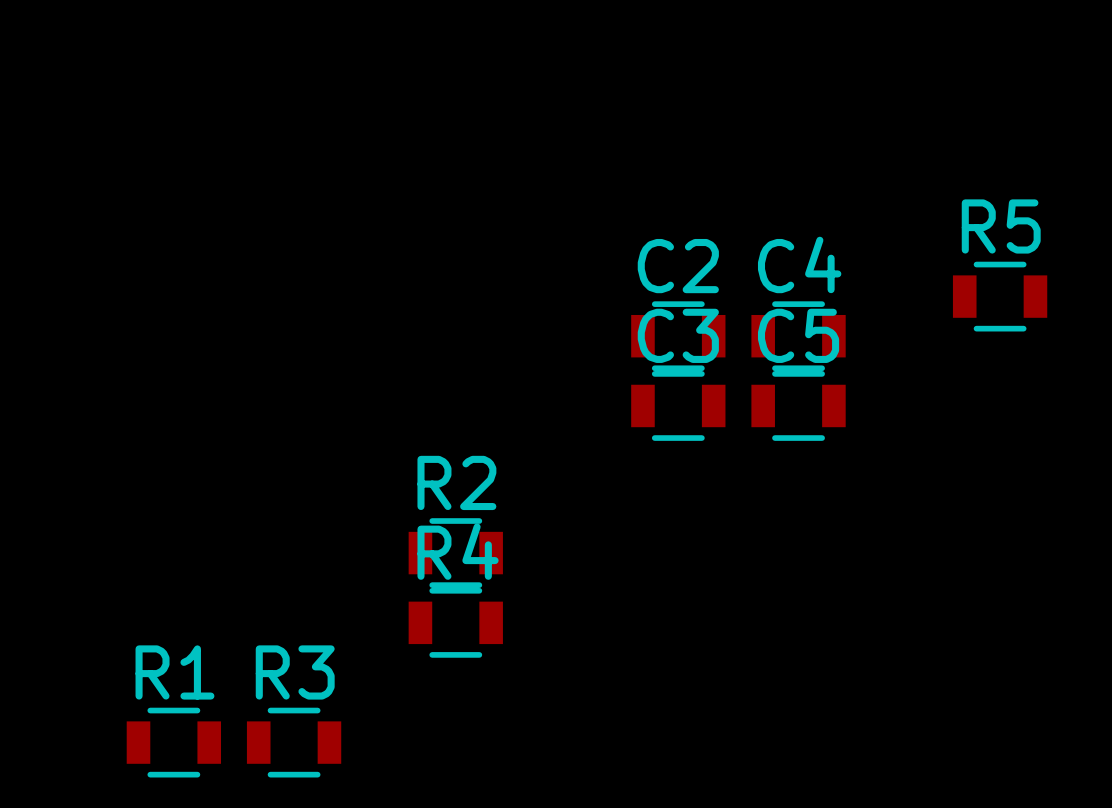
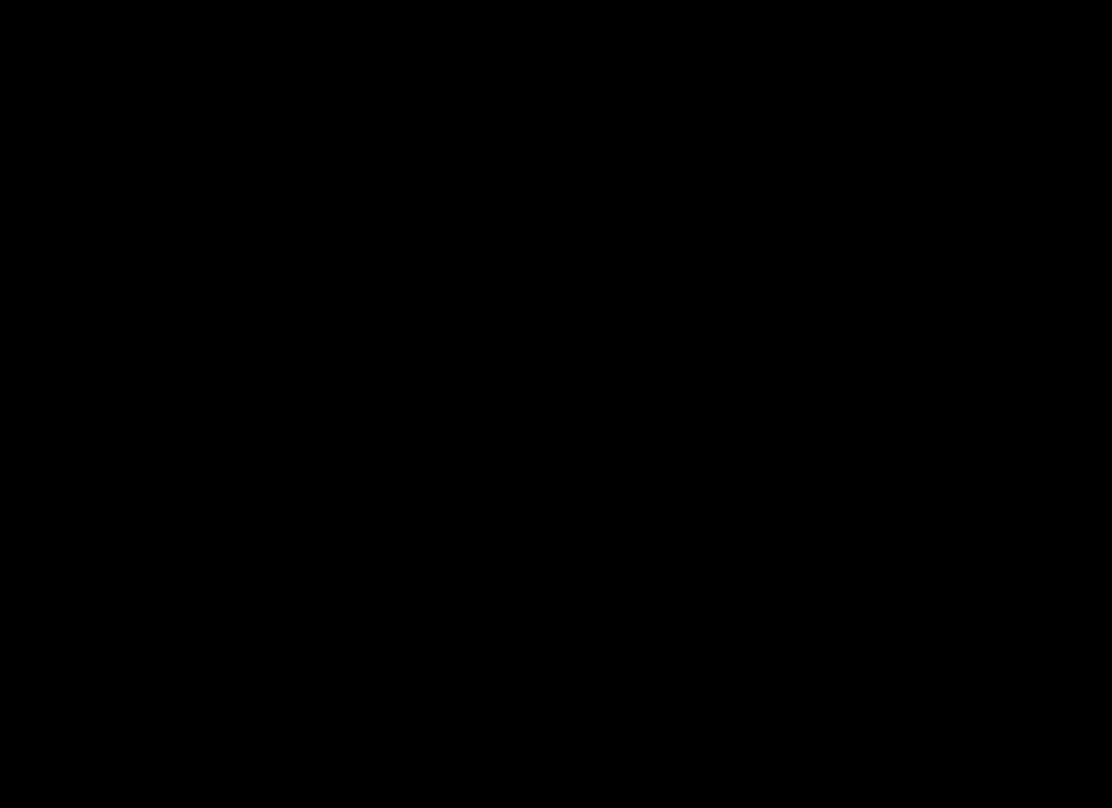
R5: (1000, 296) -> none
C2: (678, 336) -> none
C4: (798, 336) -> none
C3: (678, 405) -> none
C5: (798, 405) -> none
R2: (455, 553) -> none
R4: (455, 622) -> none
R1: (173, 742) -> none
R3: (294, 742) -> none

